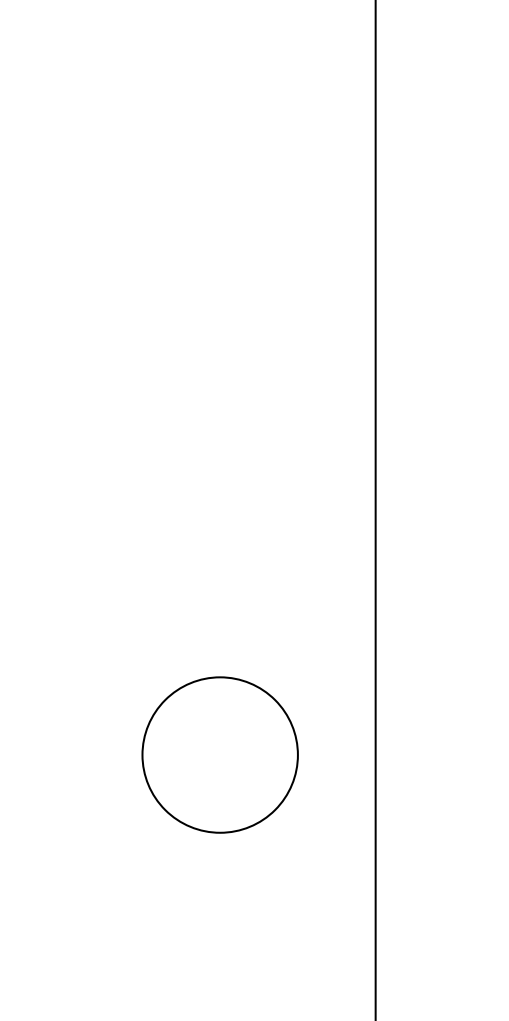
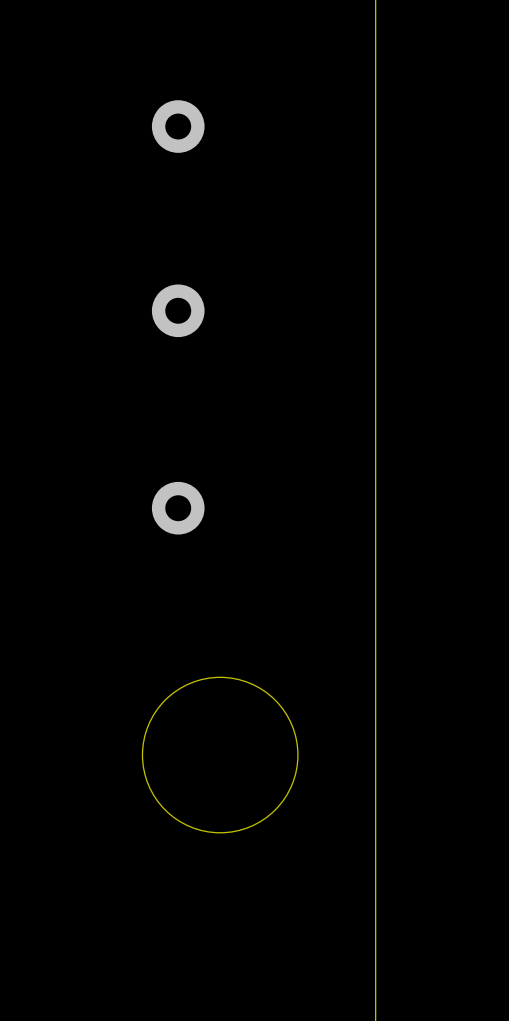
via: none -> (178, 126)
via: none -> (178, 310)
via: none -> (178, 508)

